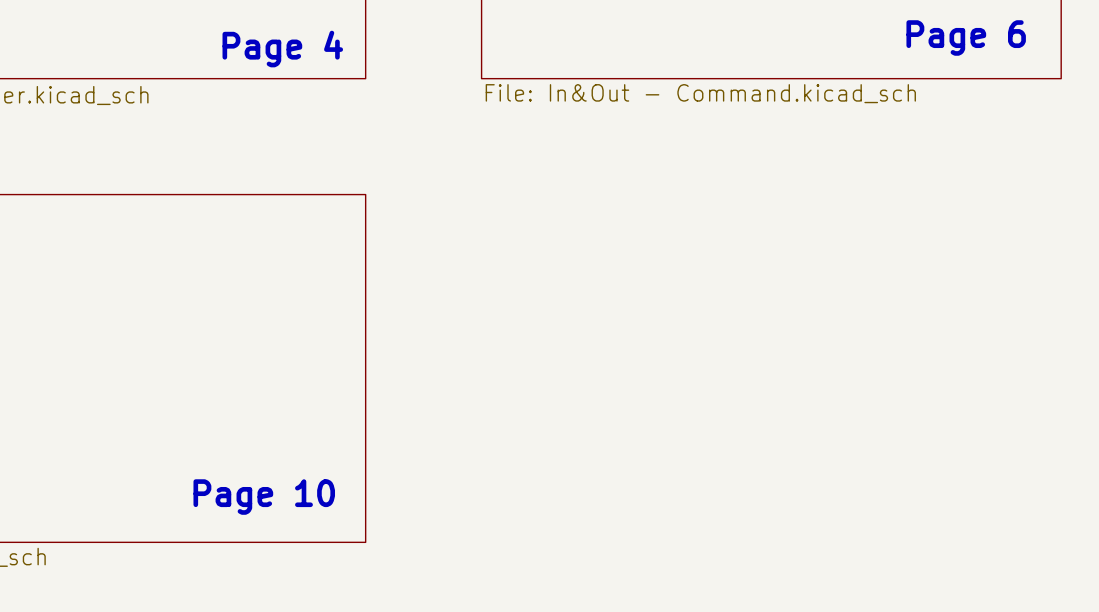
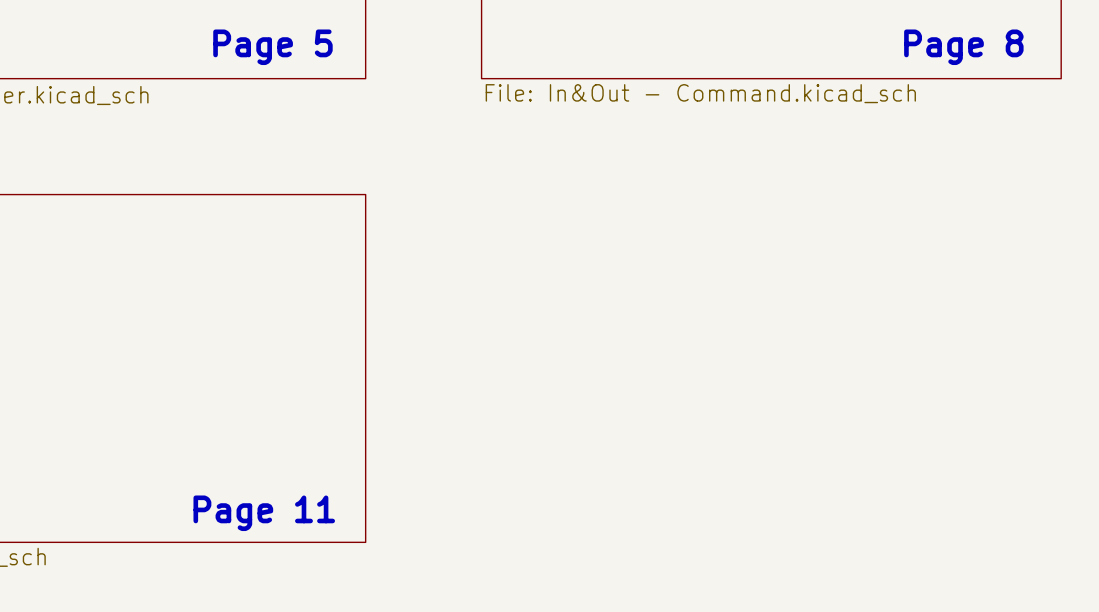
text: Page 6 (966, 37) -> Page 8 (963, 47)
text: Page 4 (282, 49) -> Page 5 (272, 47)
text: Page 10 (264, 497) -> Page 11 (264, 513)

